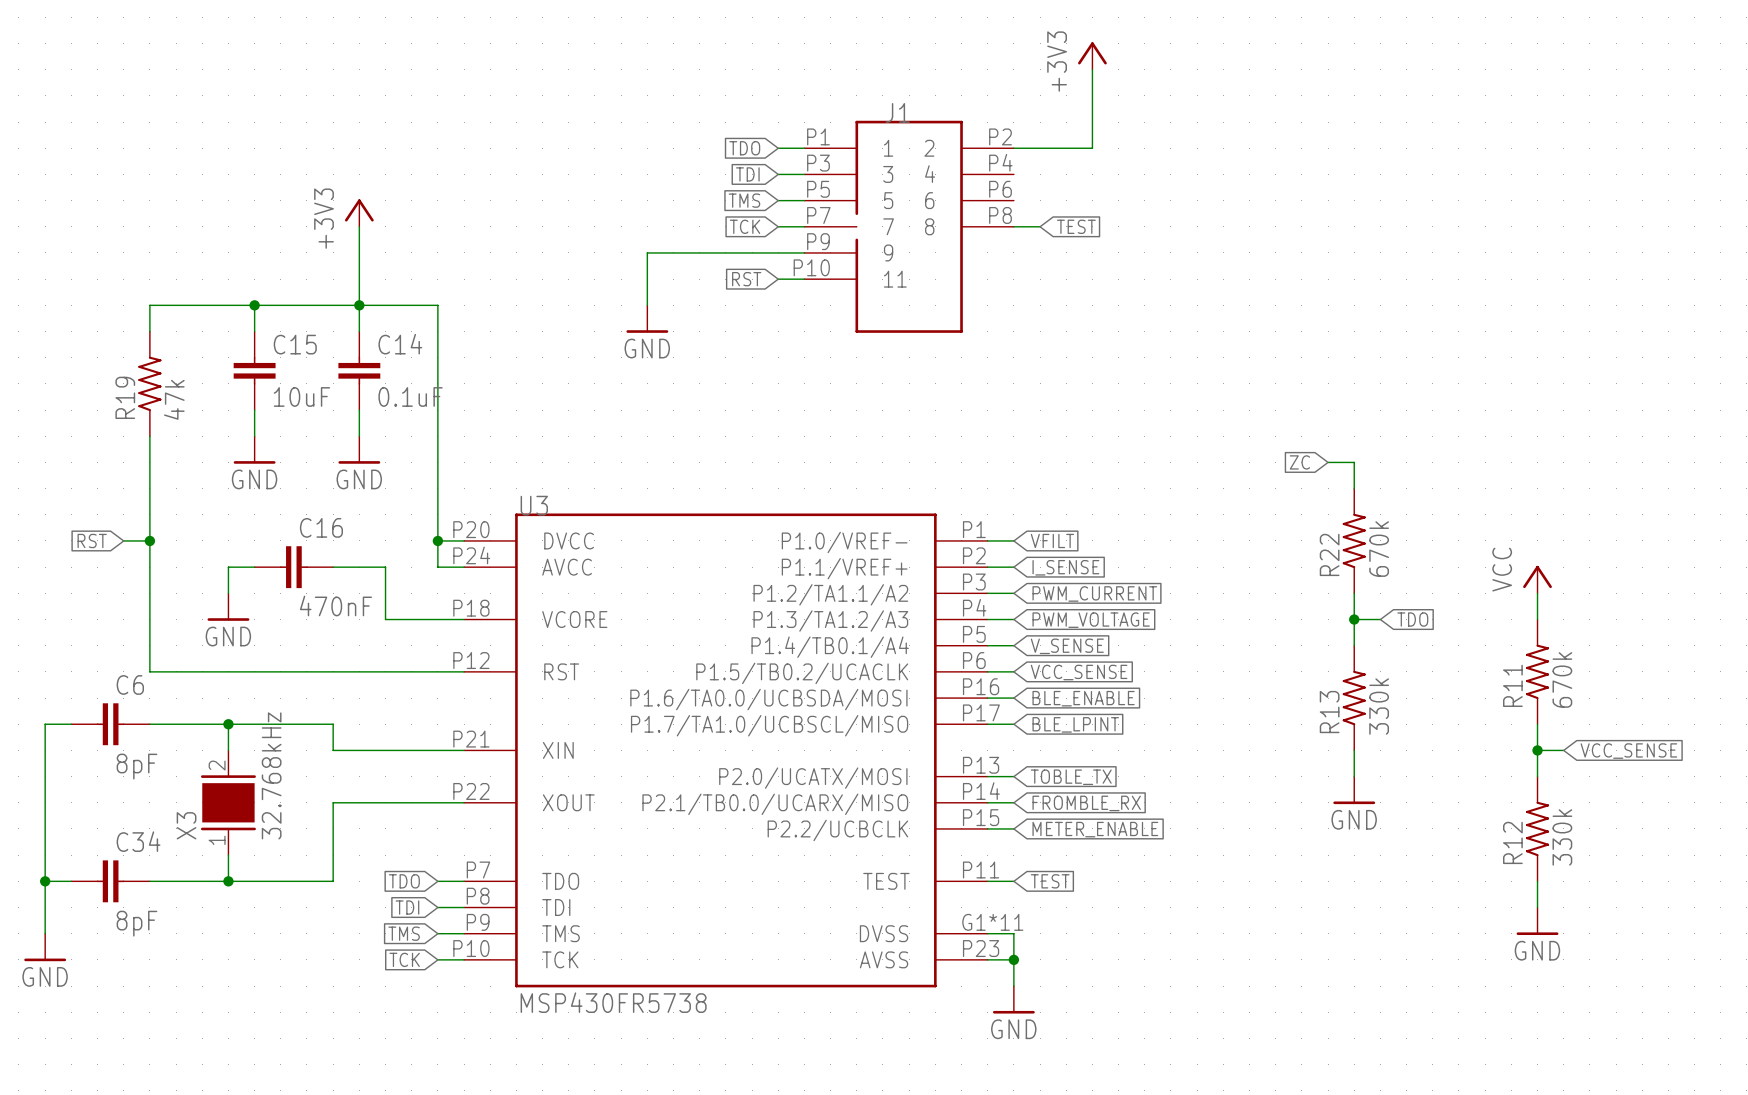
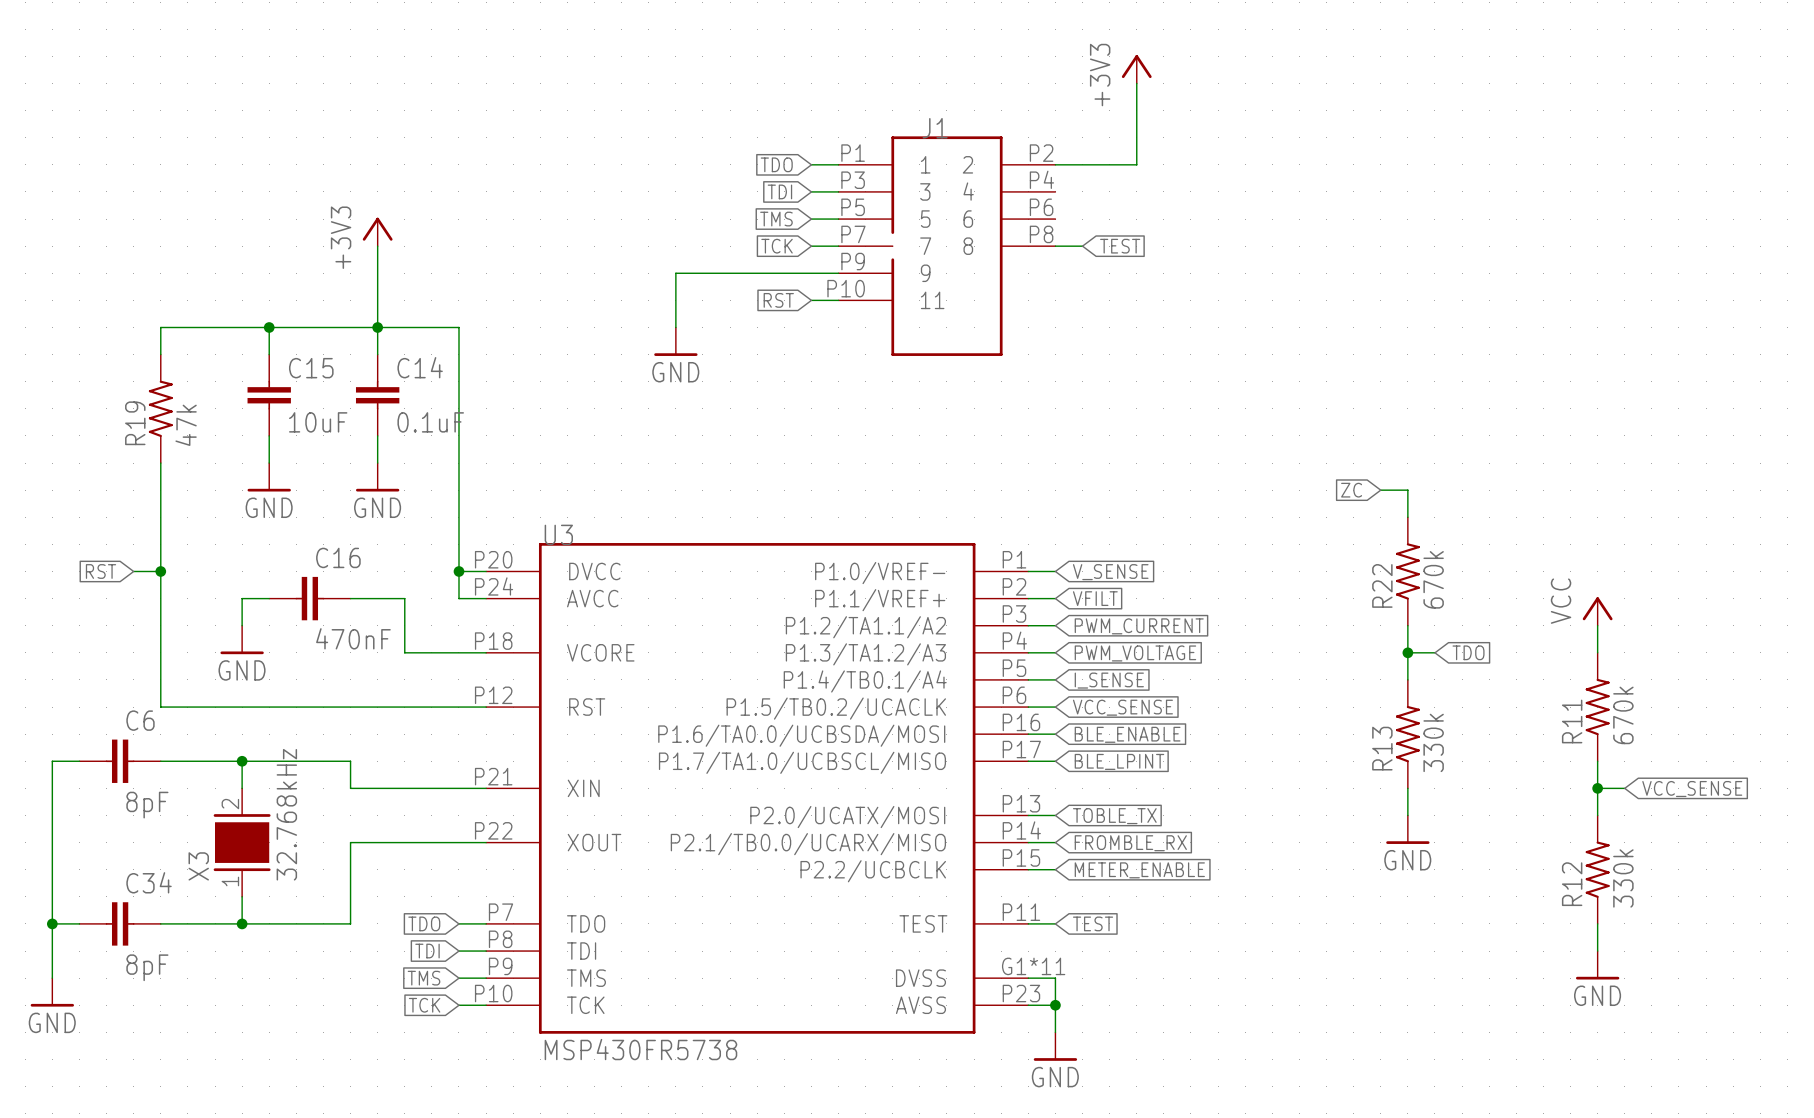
global label: VFILT (1052, 540) -> V_SENSE (1110, 572)
global label: I_SENSE (1065, 567) -> VFILT (1095, 598)
global label: V_SENSE (1067, 646) -> I_SENSE (1109, 680)

